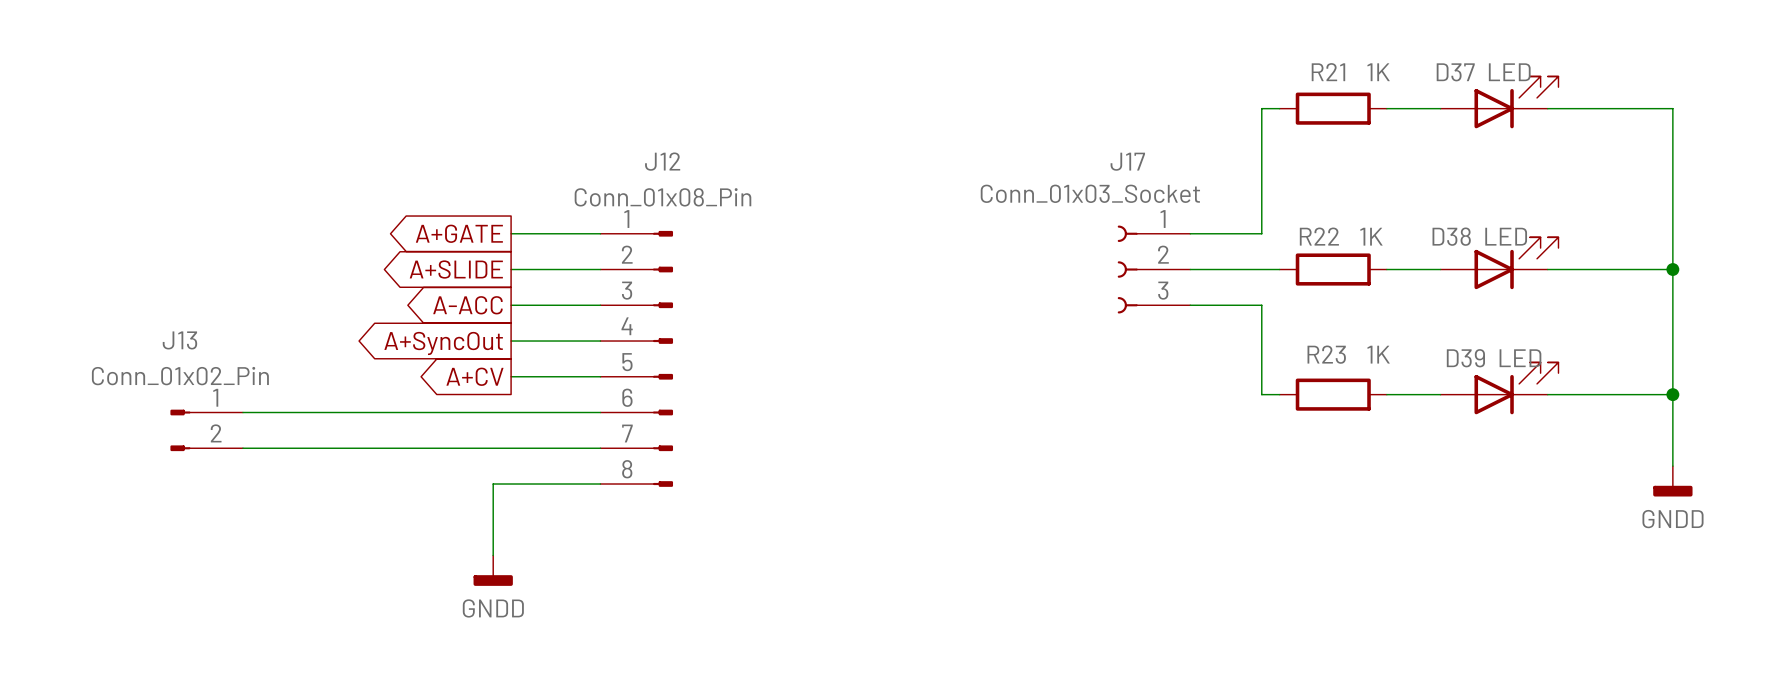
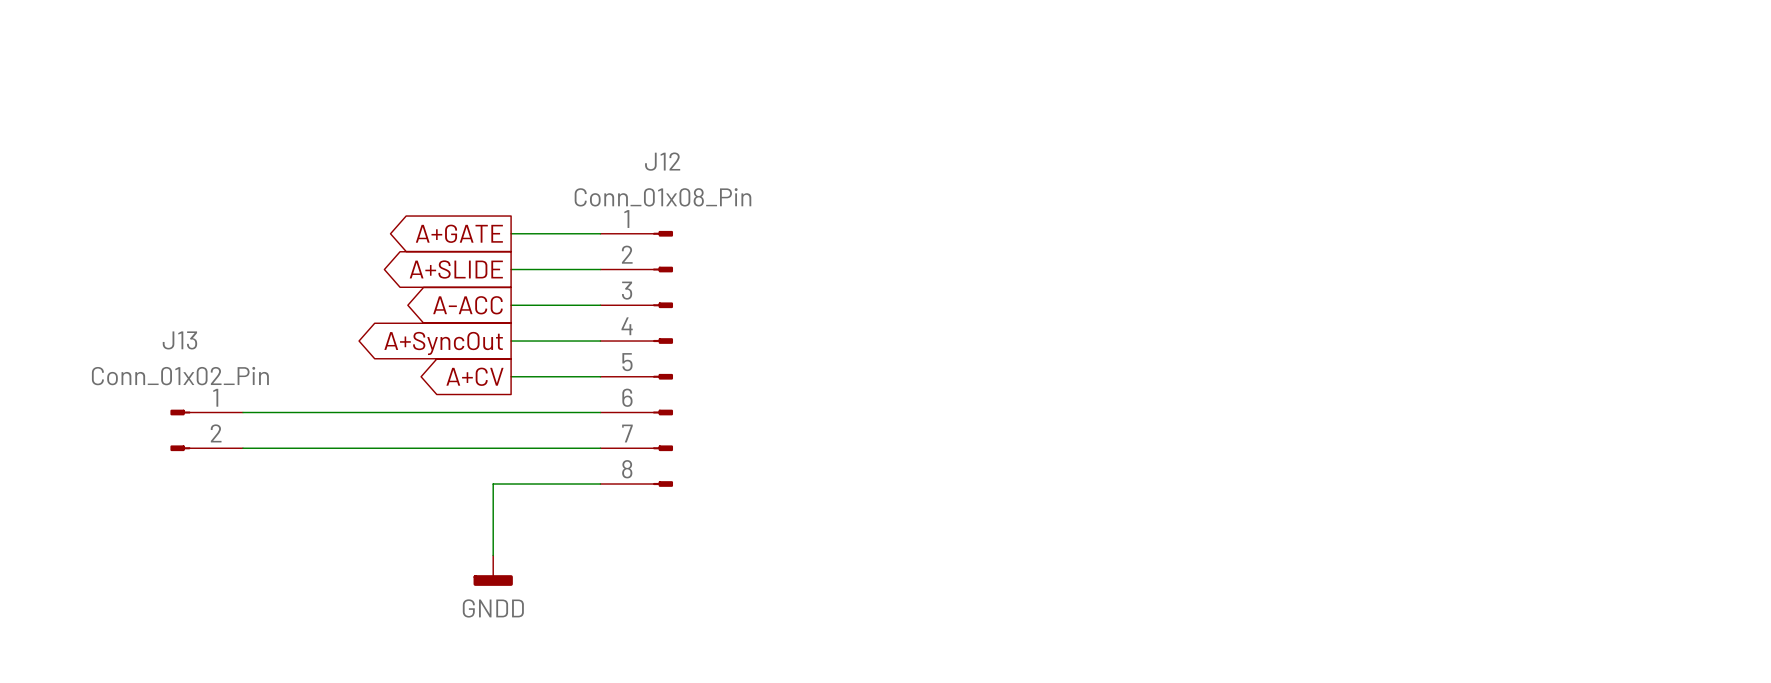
D37: LED (1499, 102) -> none
wire: (1279, 108) (1261, 108) (1261, 233) (1190, 233) -> none
R21: 1K (1333, 108) -> none
wire: (1386, 108) (1440, 108) -> none
wire: (1547, 108) (1672, 108) (1672, 466) -> none
D38: LED (1499, 263) -> none
J17: Conn_01x03_Socket (1153, 269) -> none
wire: (1190, 269) (1279, 269) -> none
R22: 1K (1333, 269) -> none
wire: (1386, 269) (1440, 269) -> none
wire: (1547, 269) (1672, 269) -> none
junction: (1672, 269) -> none
wire: (1190, 305) (1261, 305) (1261, 394) (1279, 394) -> none
D39: LED (1499, 388) -> none
R23: 1K (1333, 394) -> none
wire: (1386, 394) (1440, 394) -> none
wire: (1547, 394) (1672, 394) -> none
junction: (1672, 394) -> none
power symbol: GNDD (1672, 481) -> none

